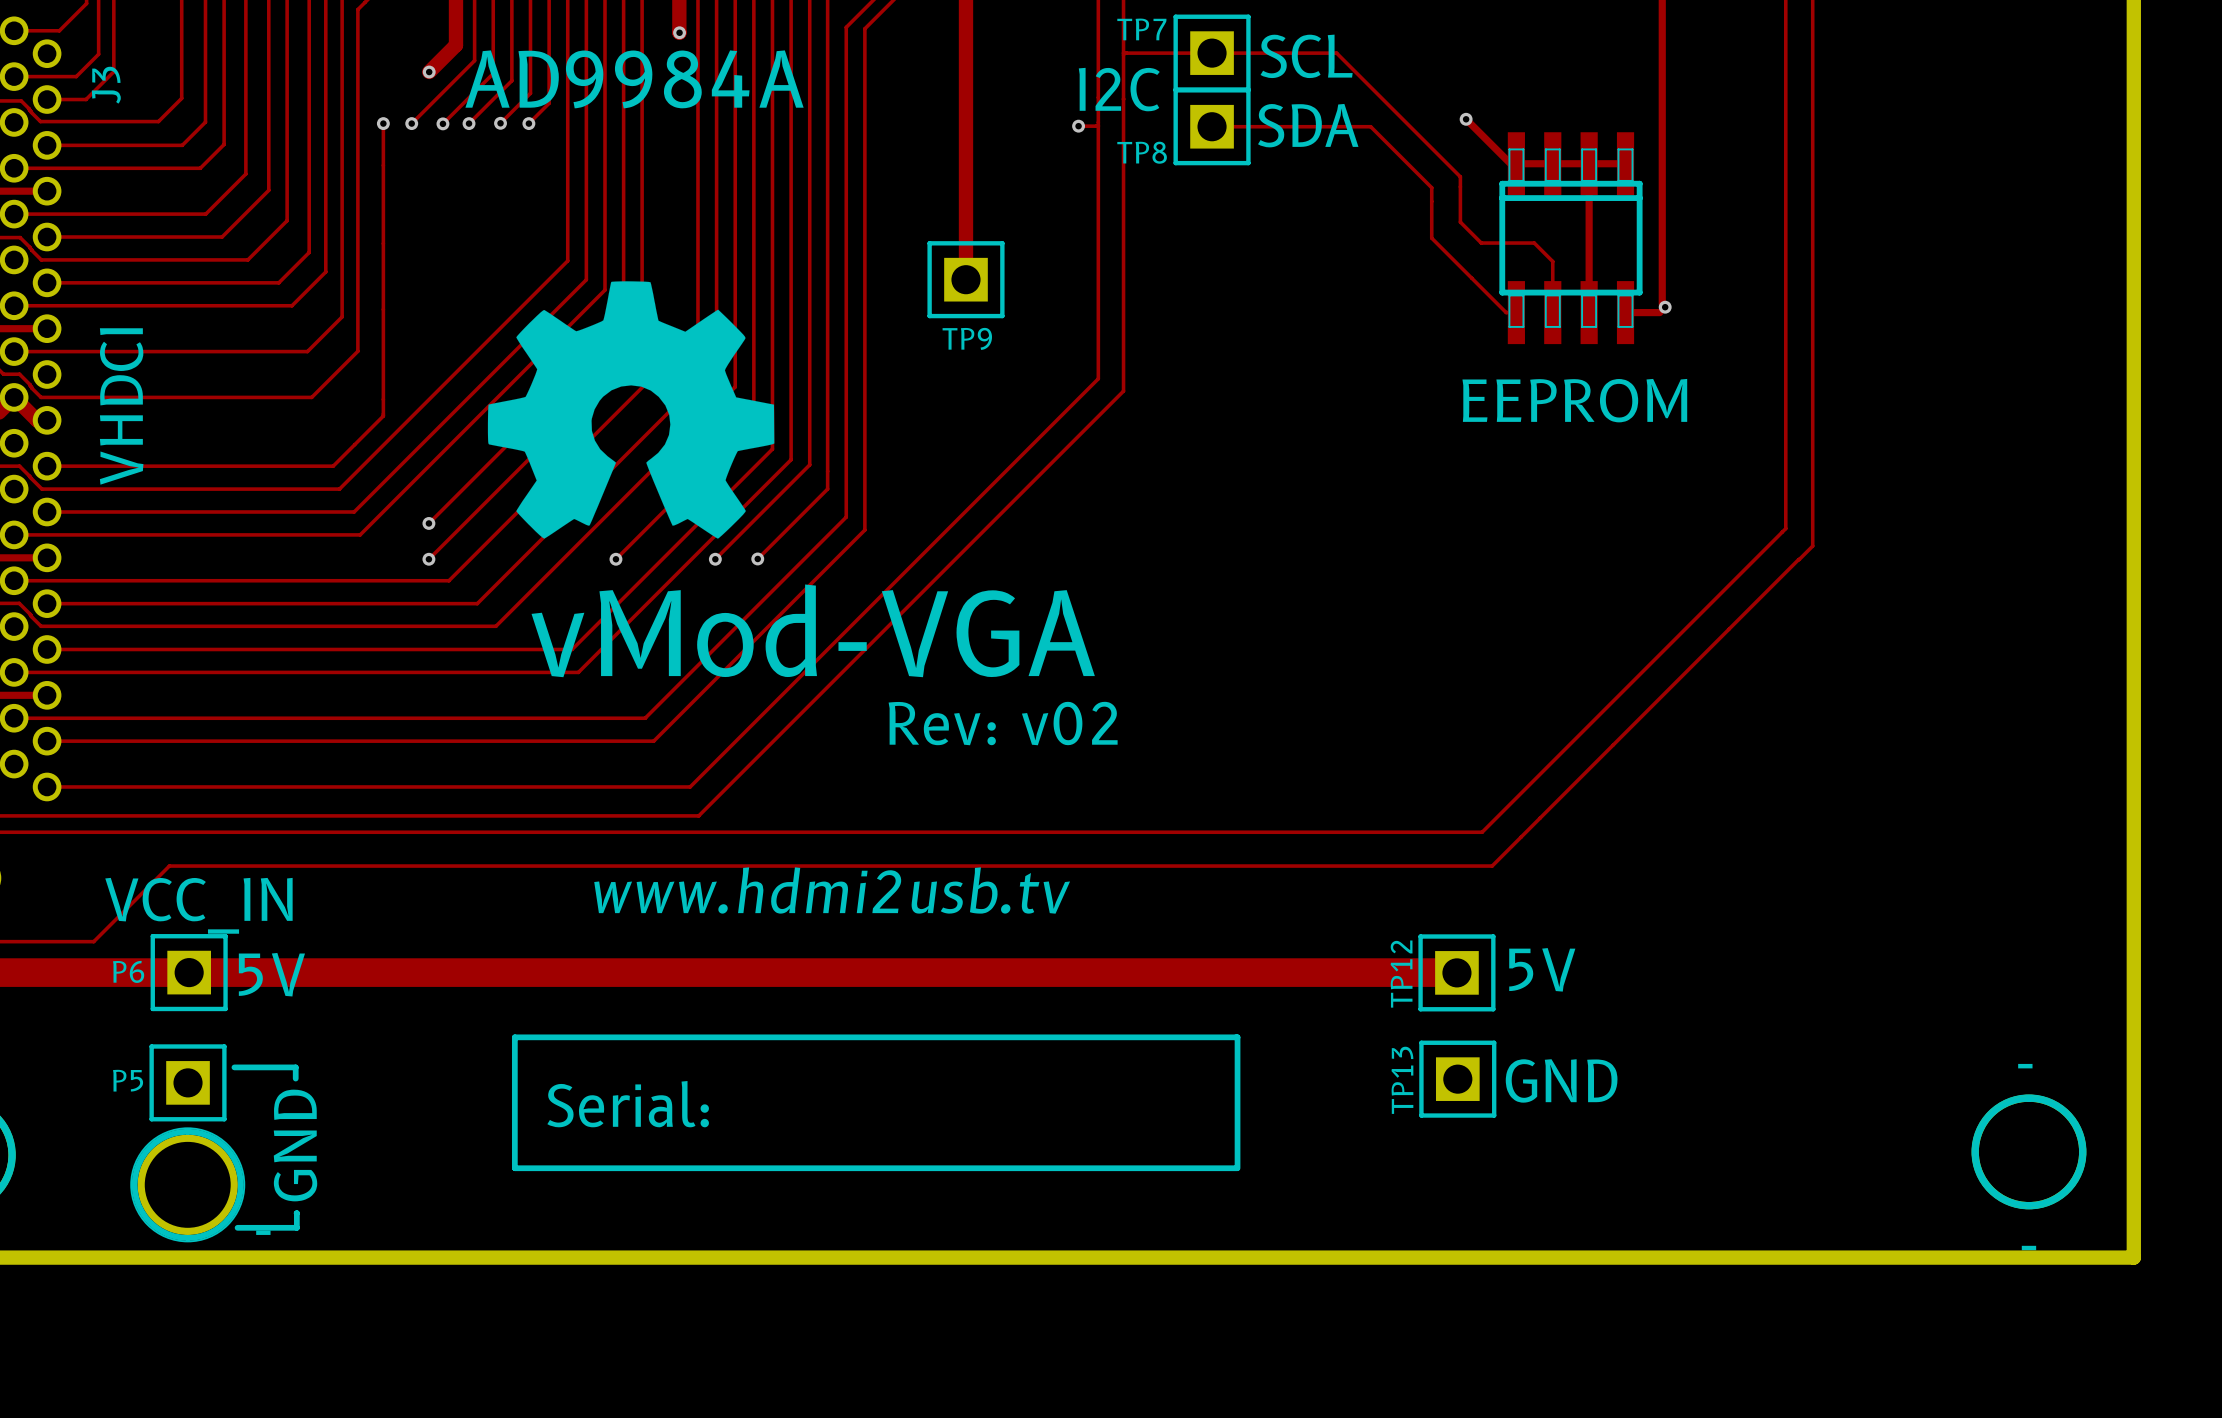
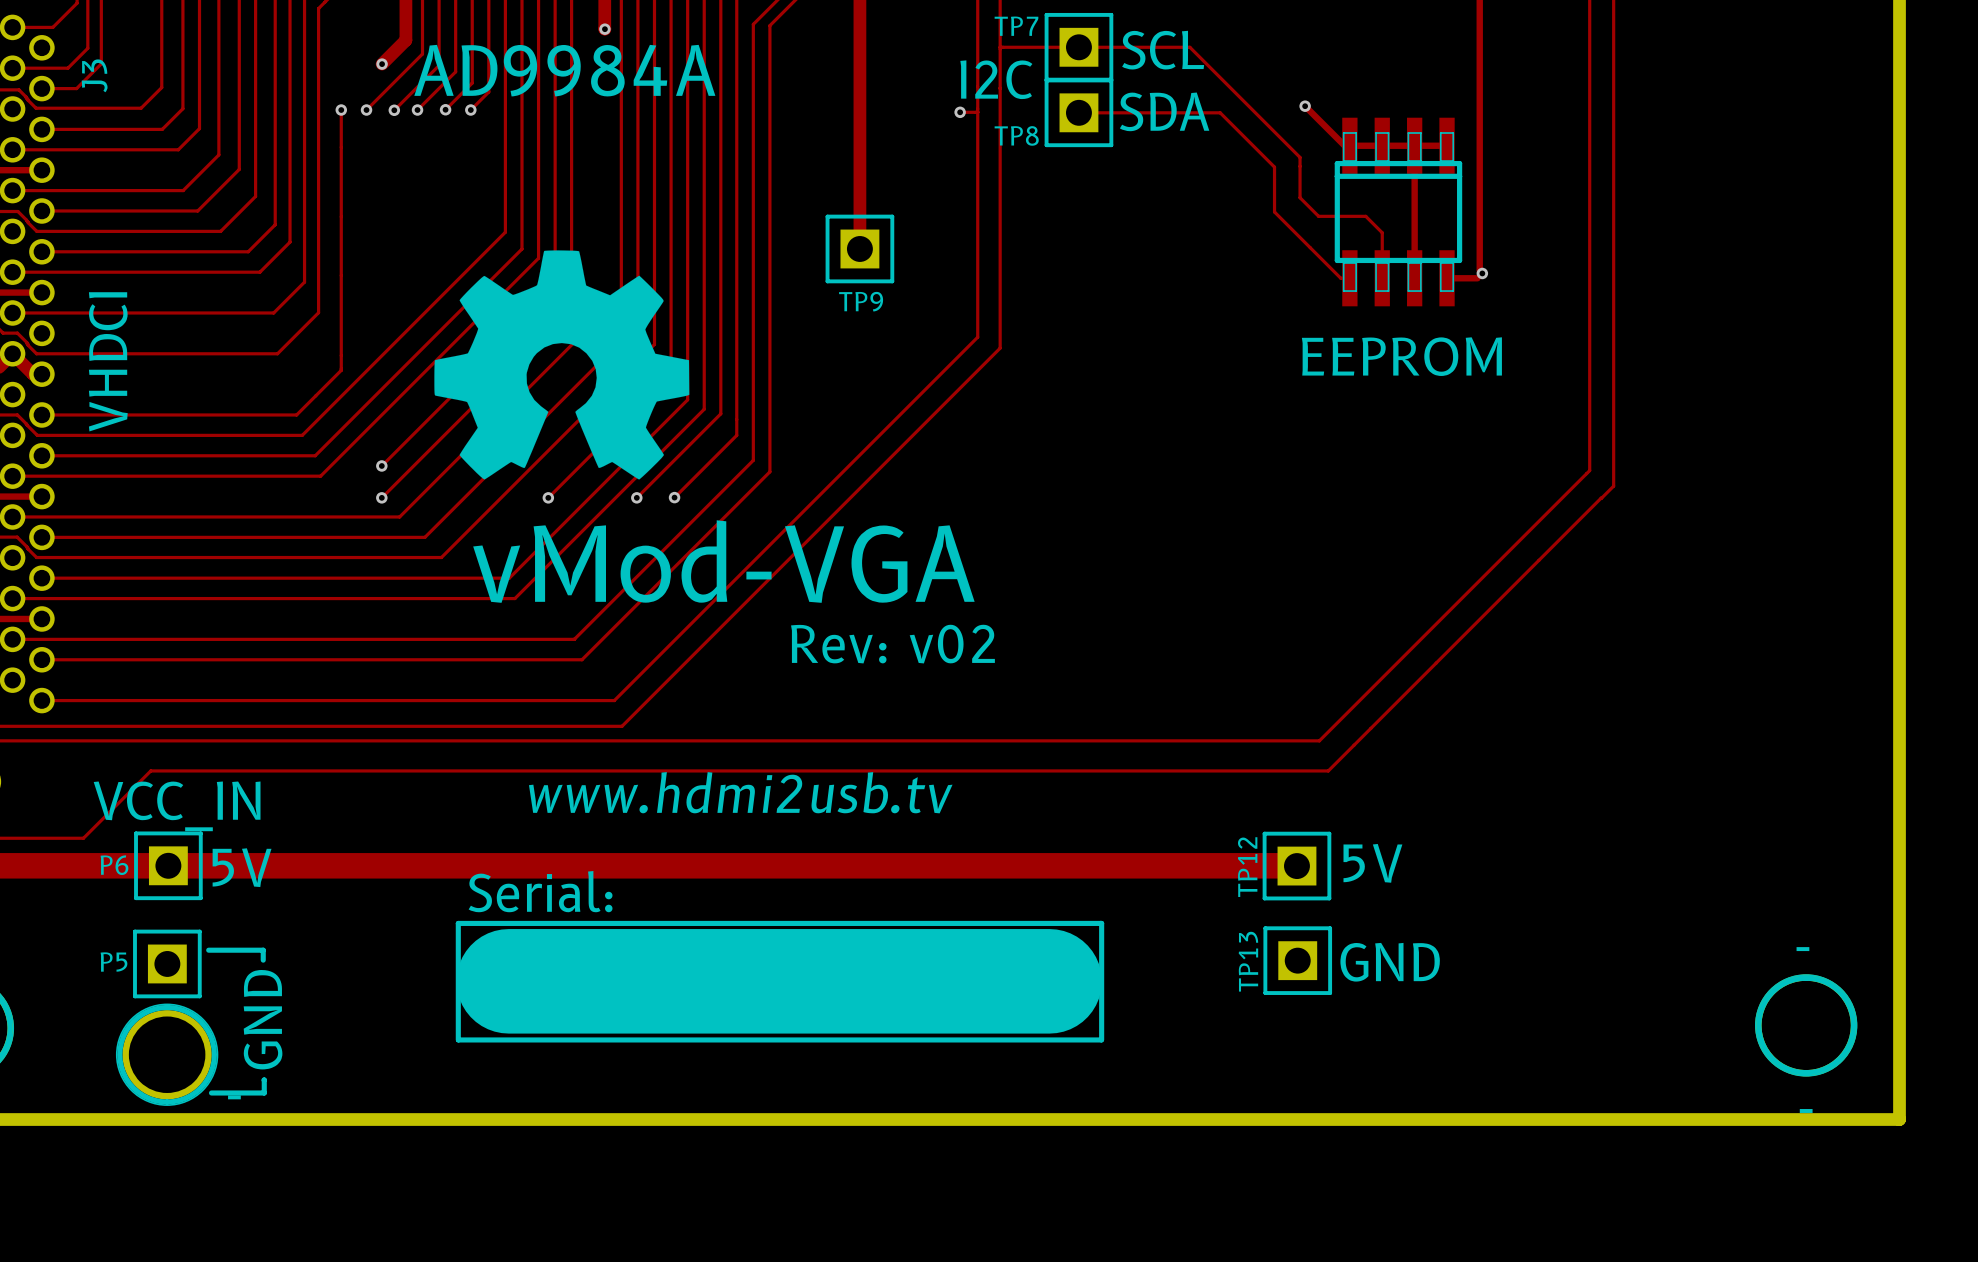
line: none -> (508, 981) (1049, 981)
text position: Serial: (628, 1104) -> Serial: (540, 891)

